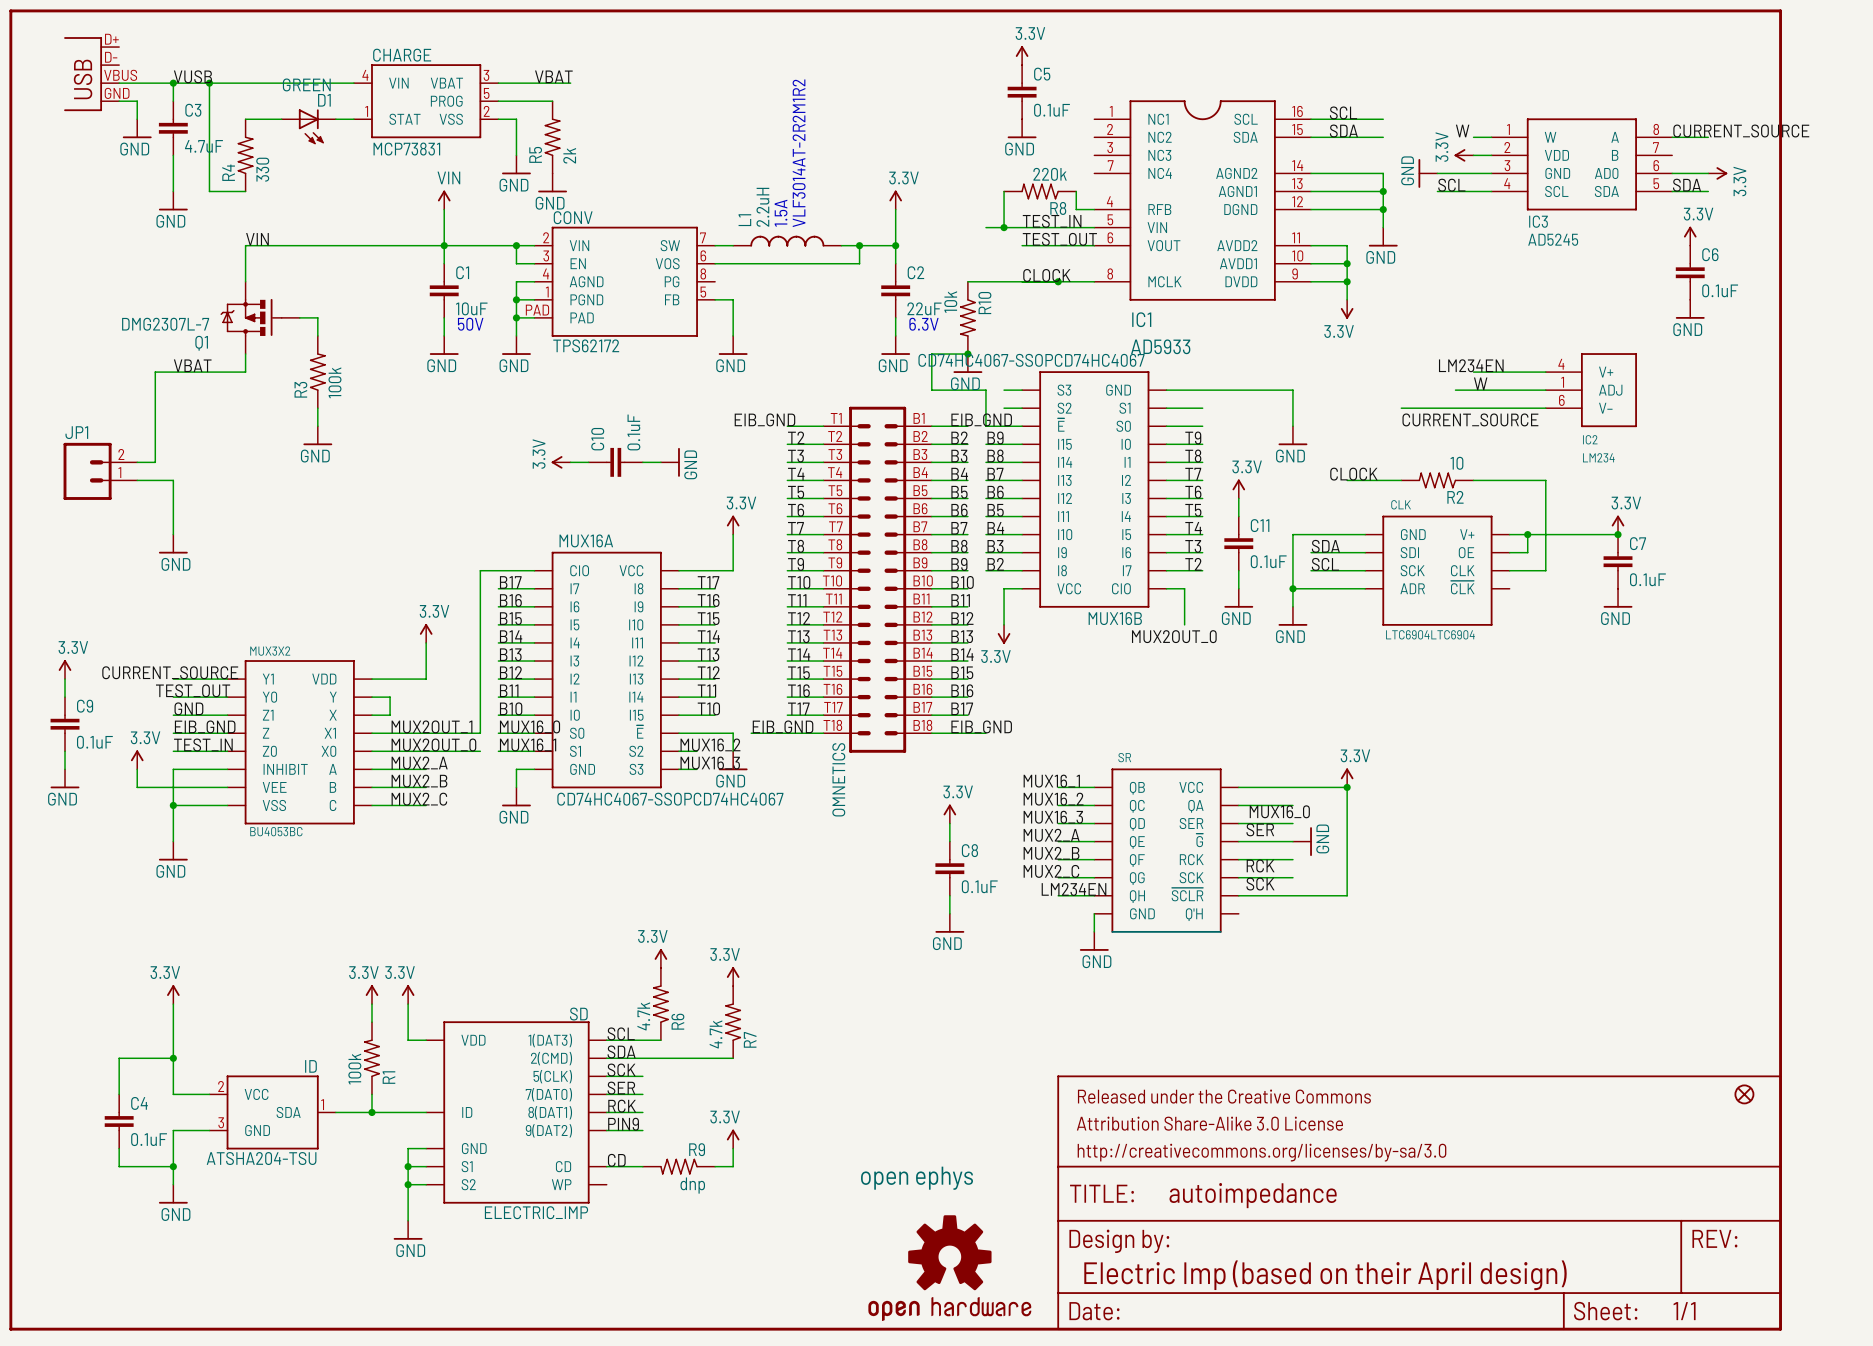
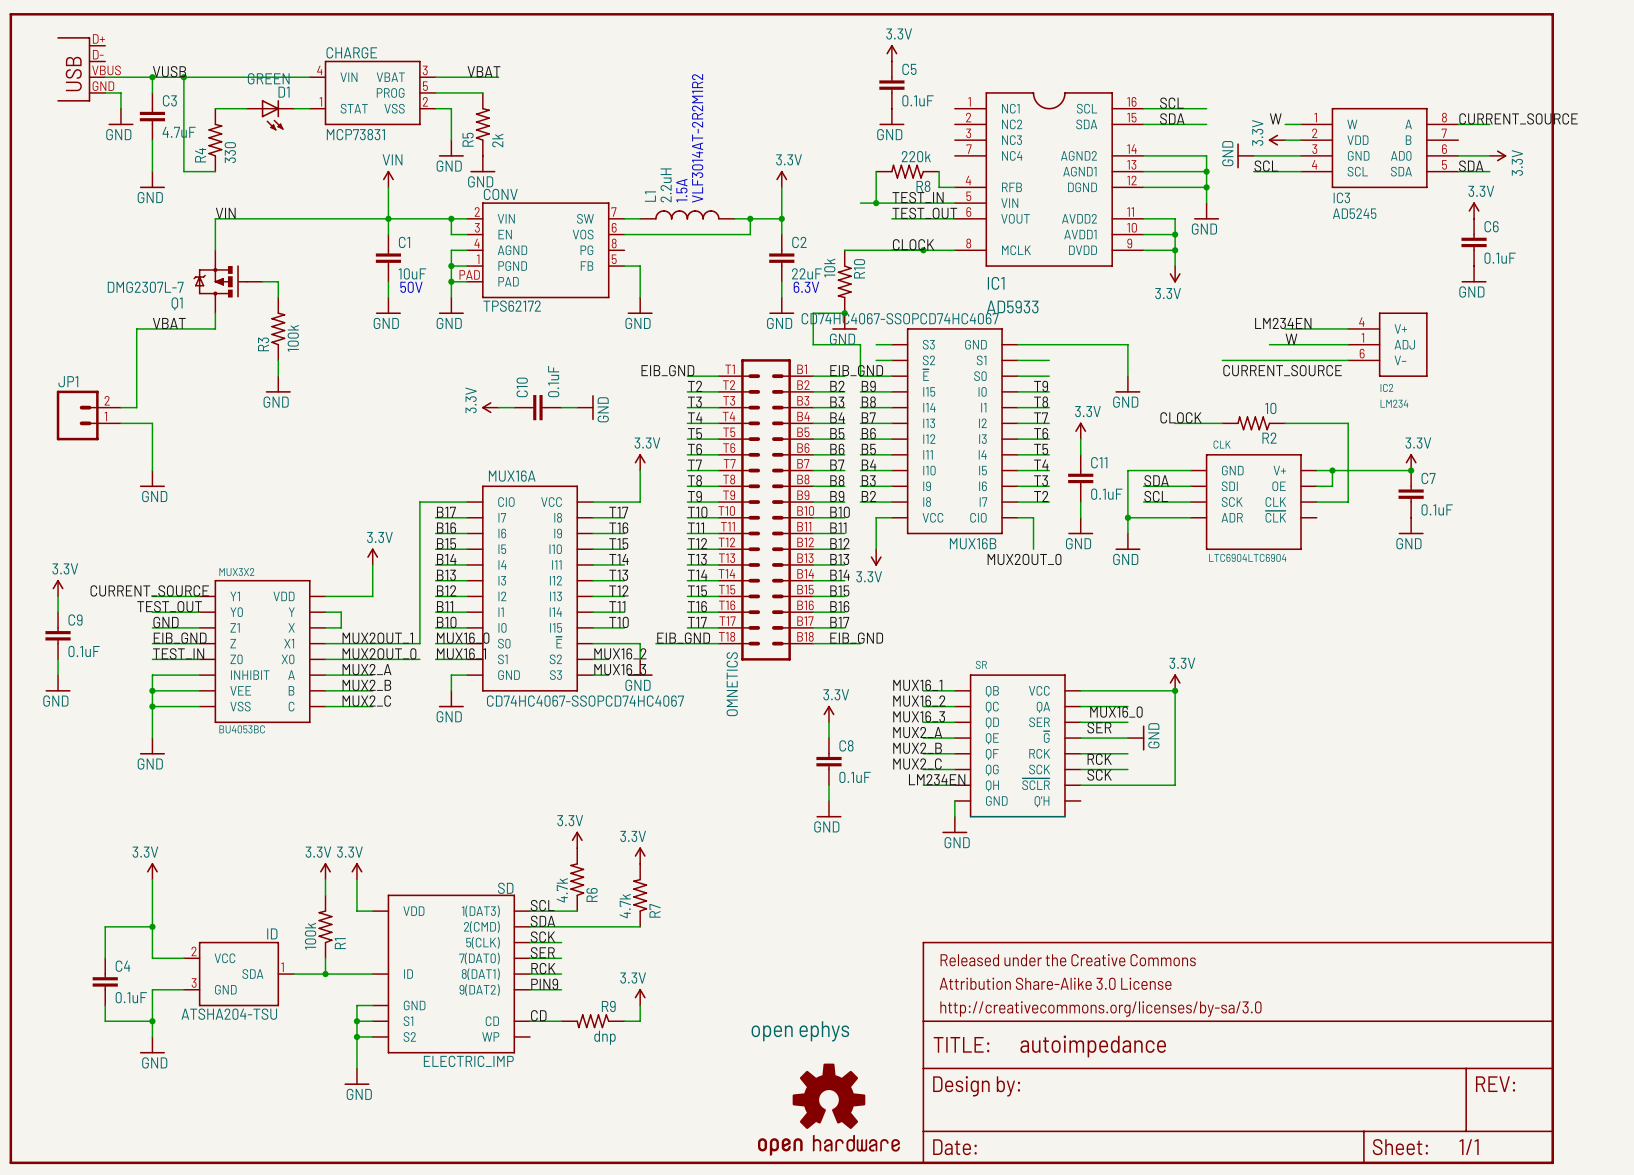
power symbol: 3.3V (137, 759) -> none
wire: (137, 769) (137, 787) (173, 787) -> none
junction: none -> (152, 690)
part: (1744, 1094) -> none
text: Electric Imp (based on their April design) (1325, 1275) -> none

